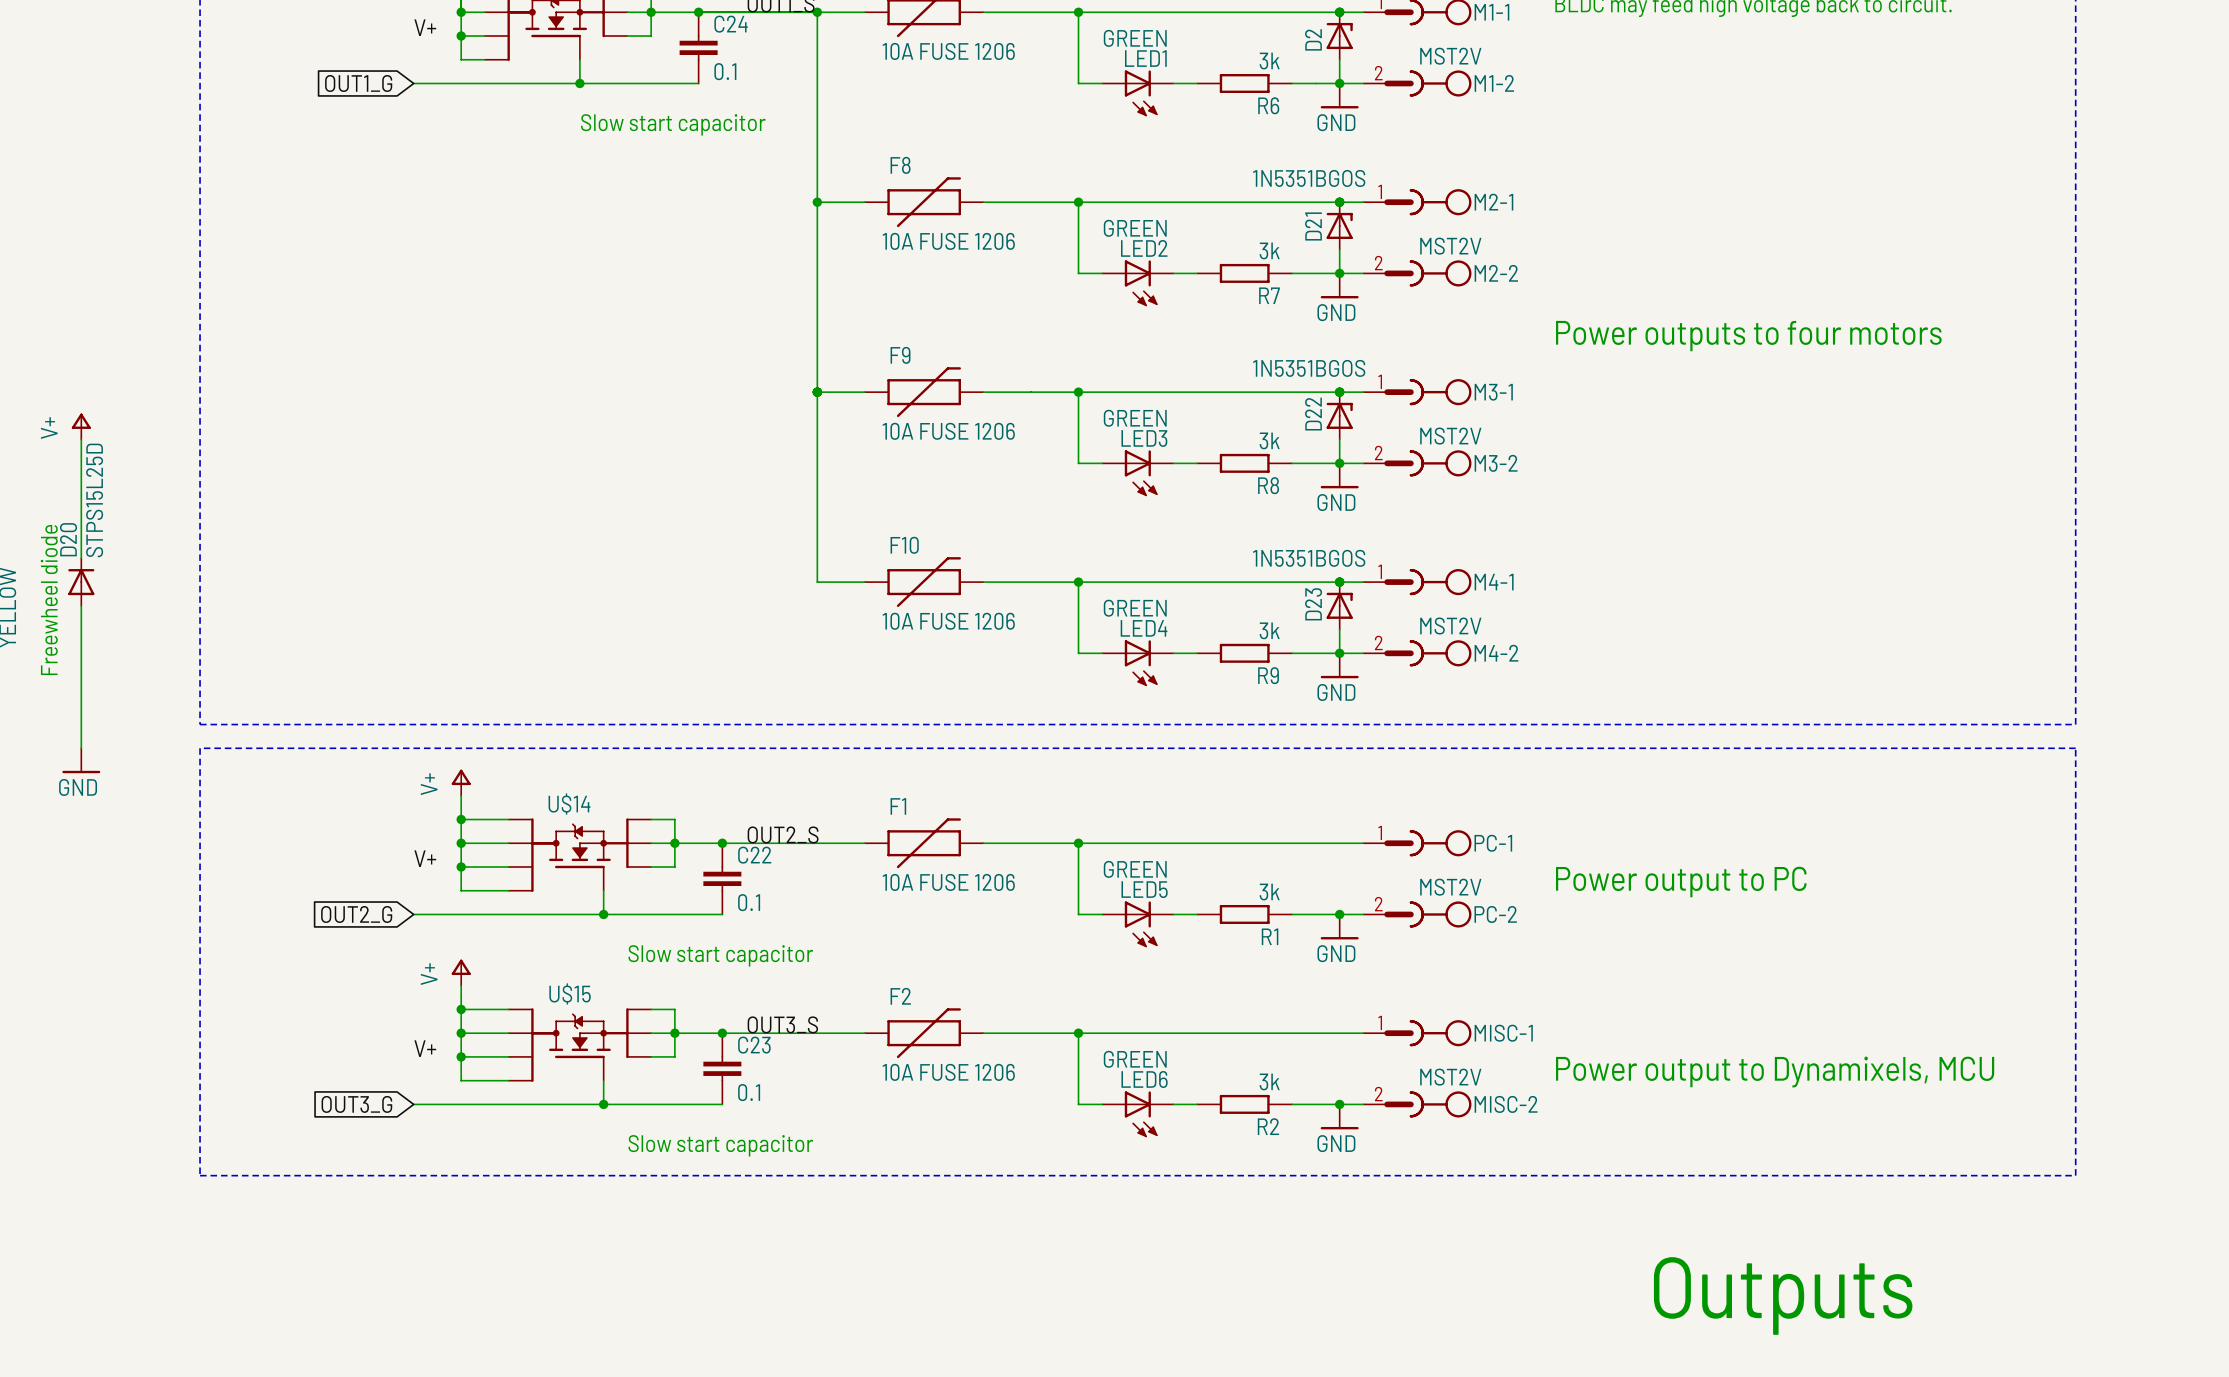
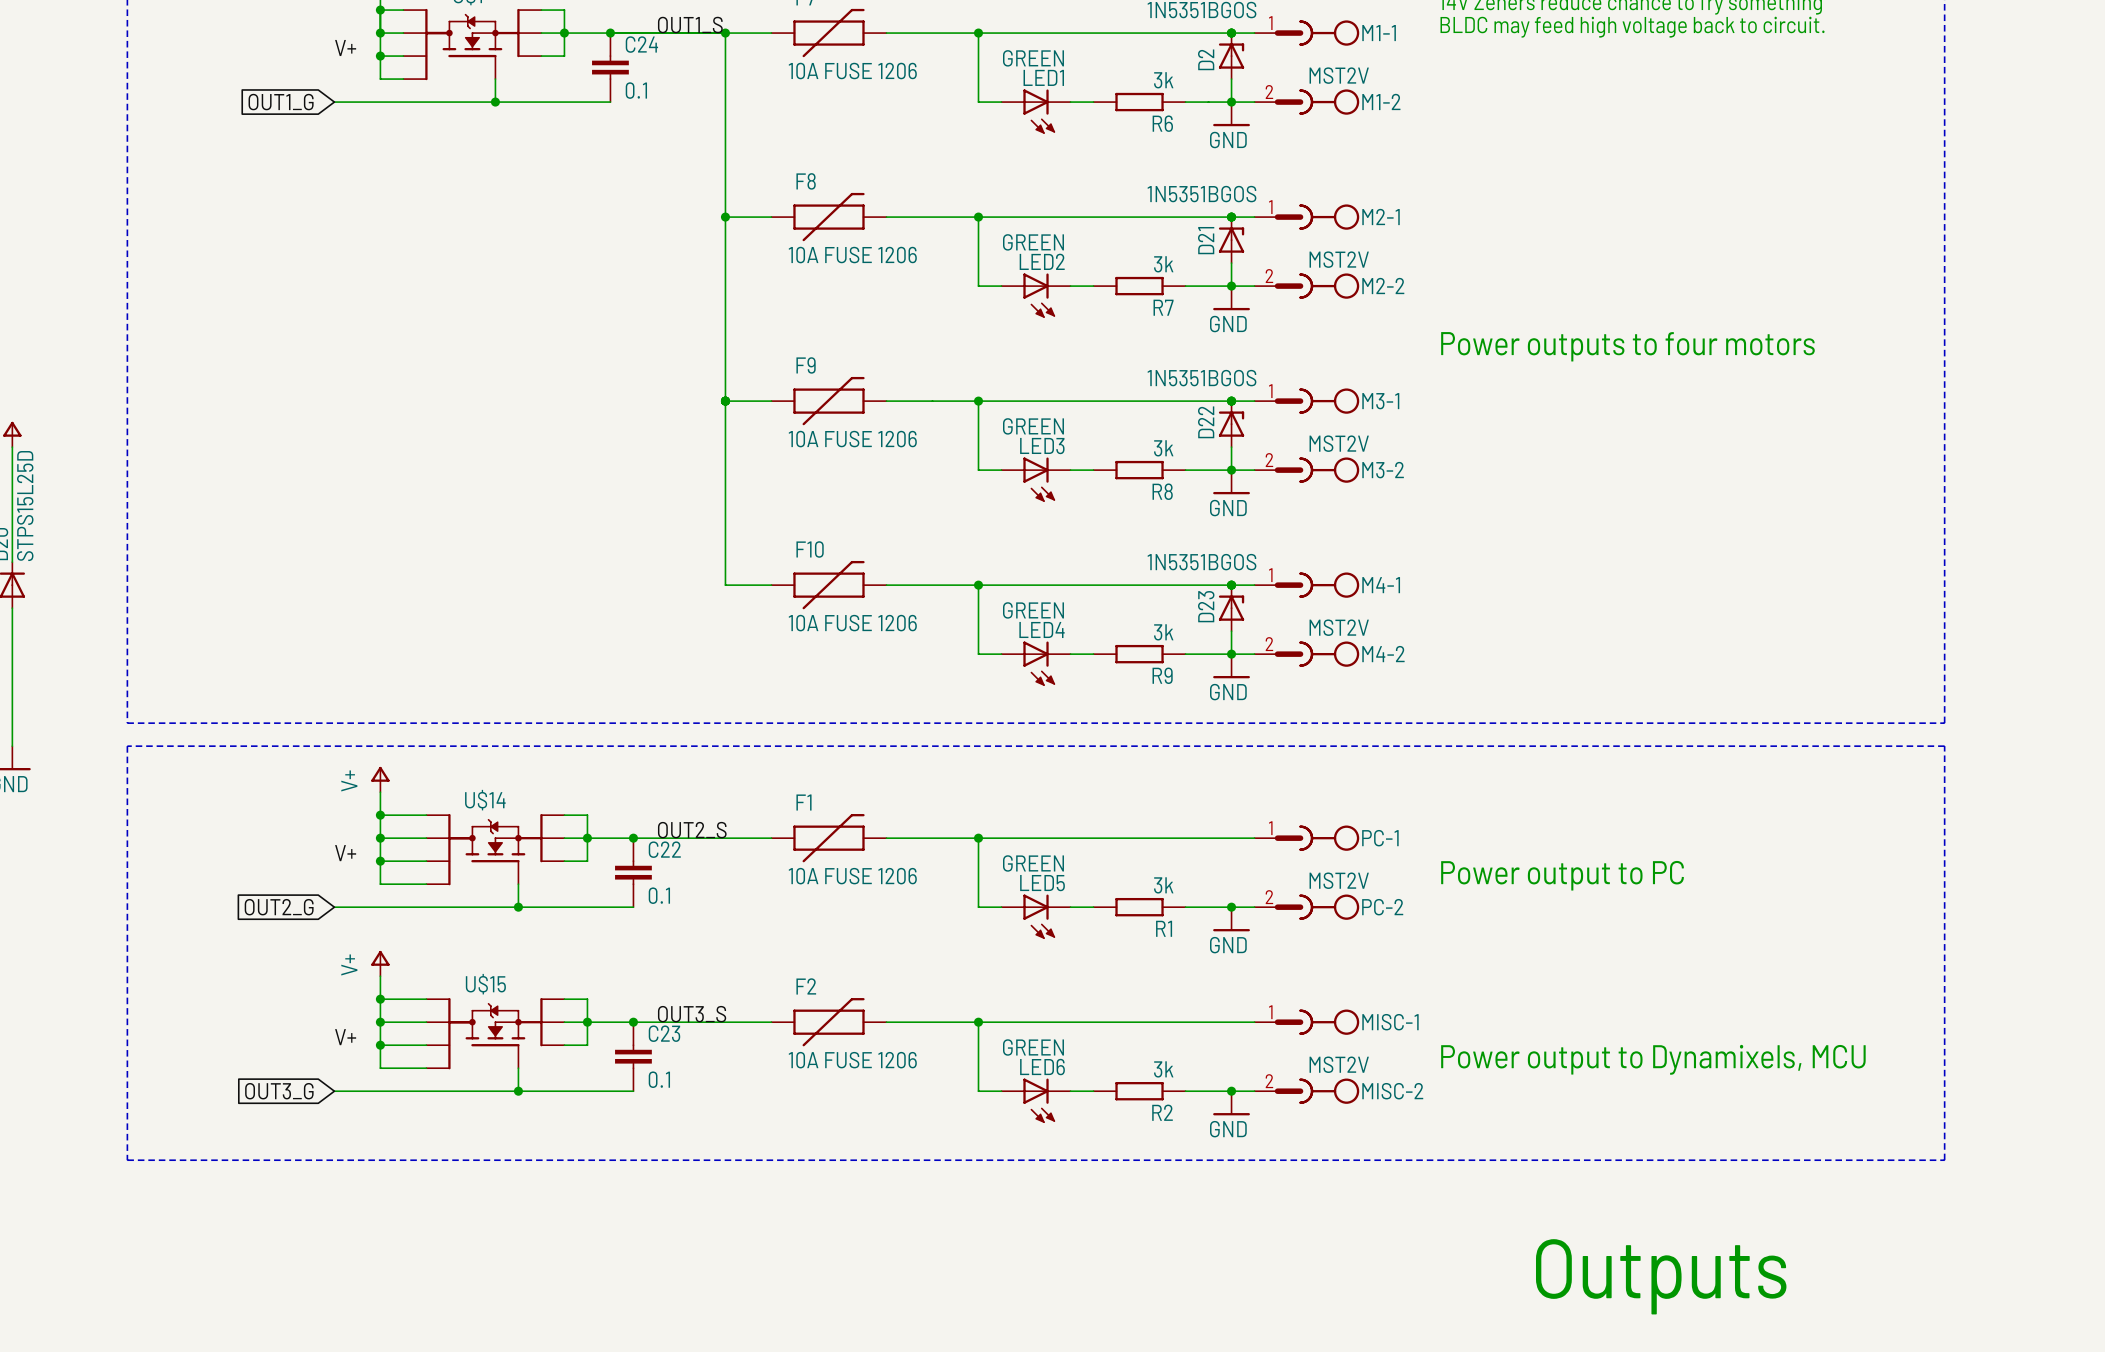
text: Slow start capacitor (673, 124) -> none
text: Slow start capacitor (720, 955) -> none
text: Slow start capacitor (720, 1145) -> none

